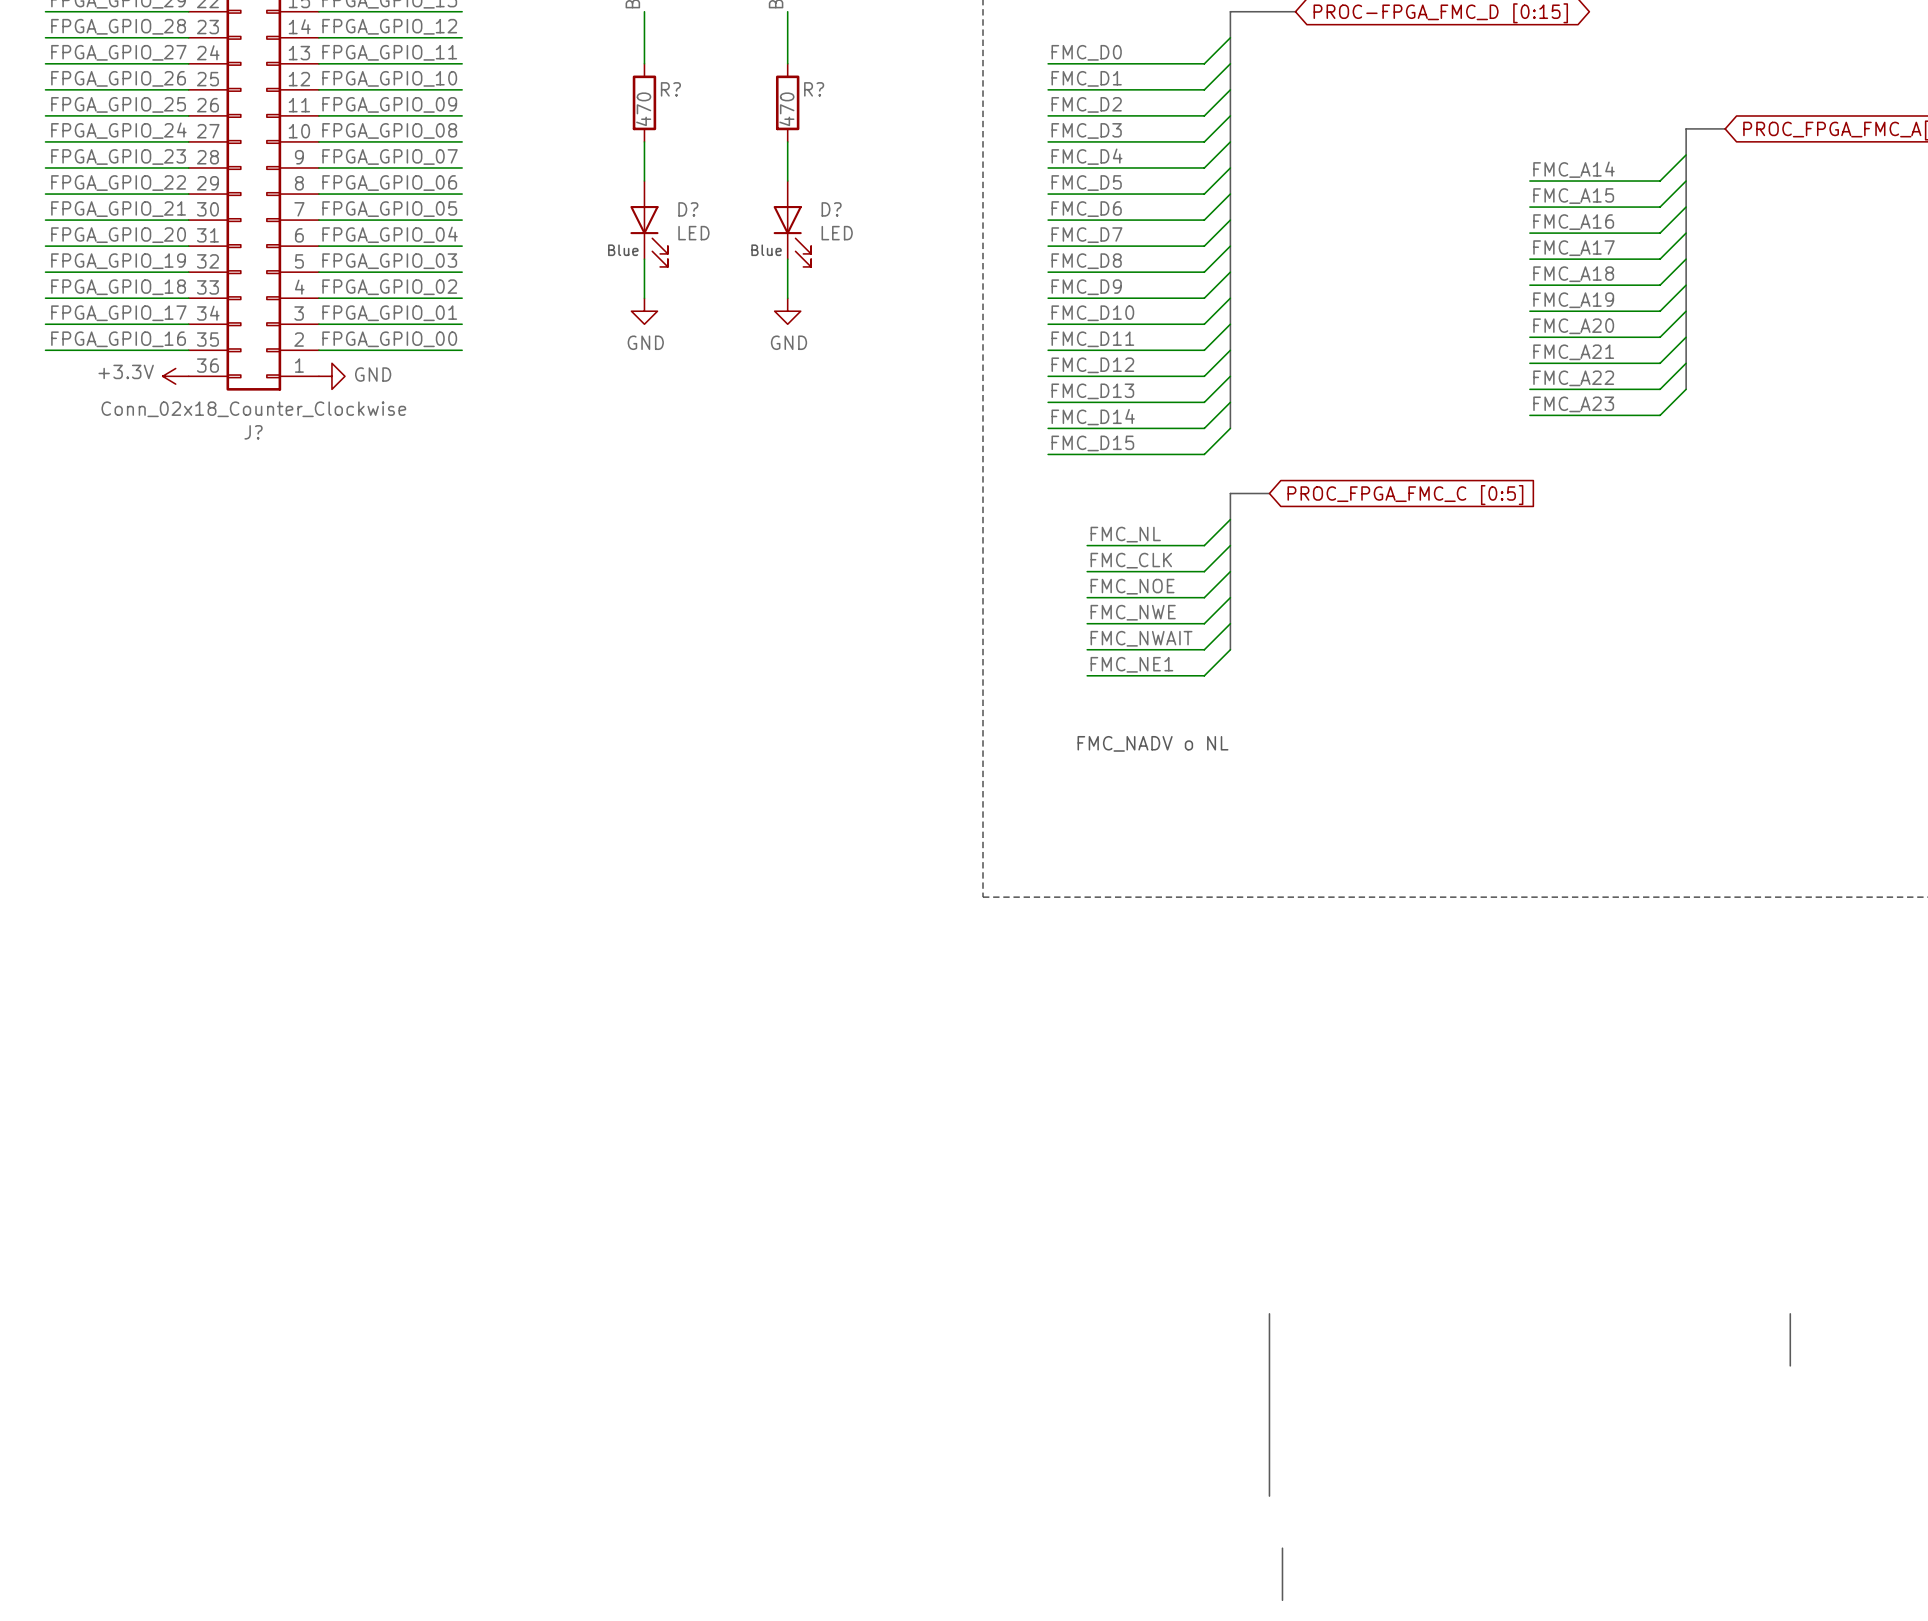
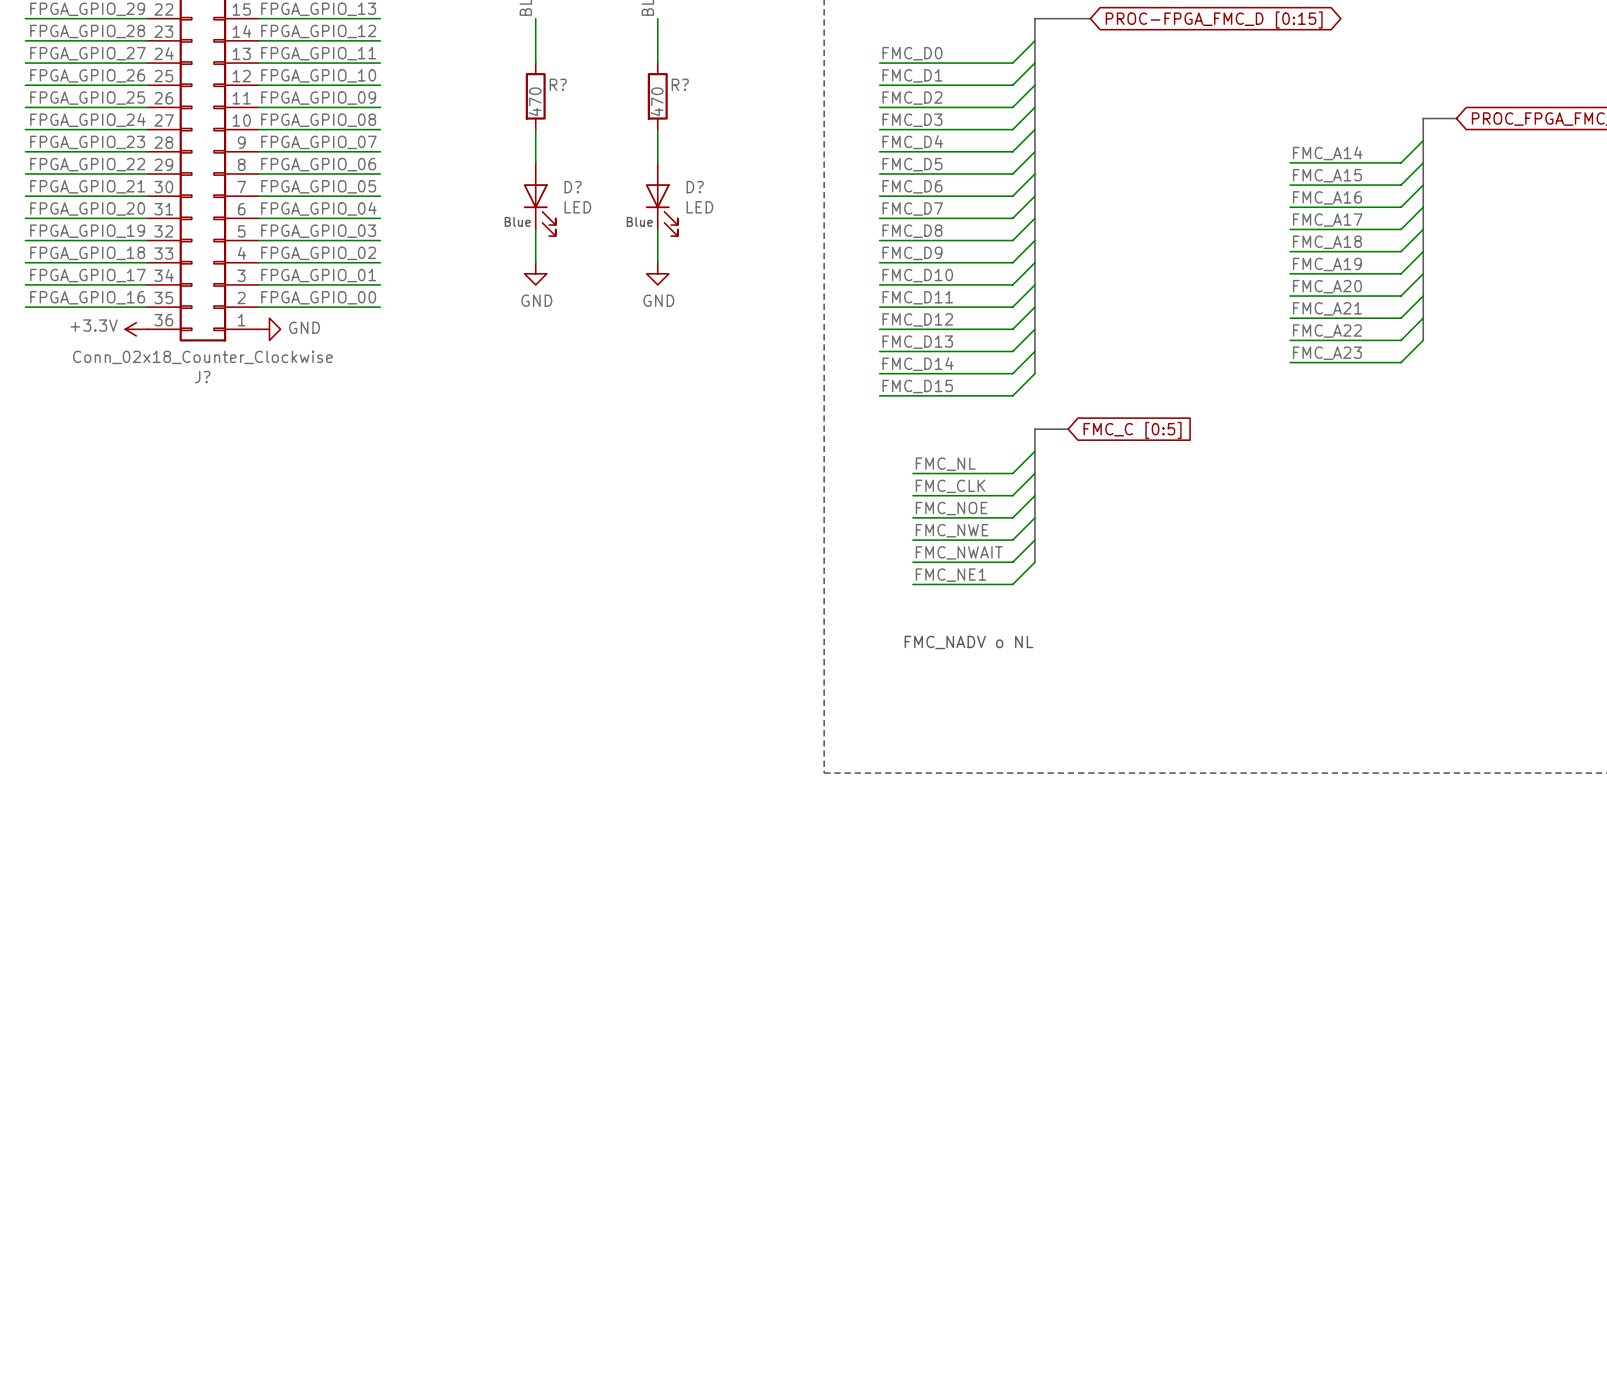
global label: PROC_FPGA_FMC_C [0:5] (1405, 495) -> FMC_C [0:5] (1132, 430)
bus: (1269, 1313) (1269, 1496) -> none
bus: (1790, 1313) (1790, 1365) -> none
bus: (1282, 1548) (1282, 1600) -> none

